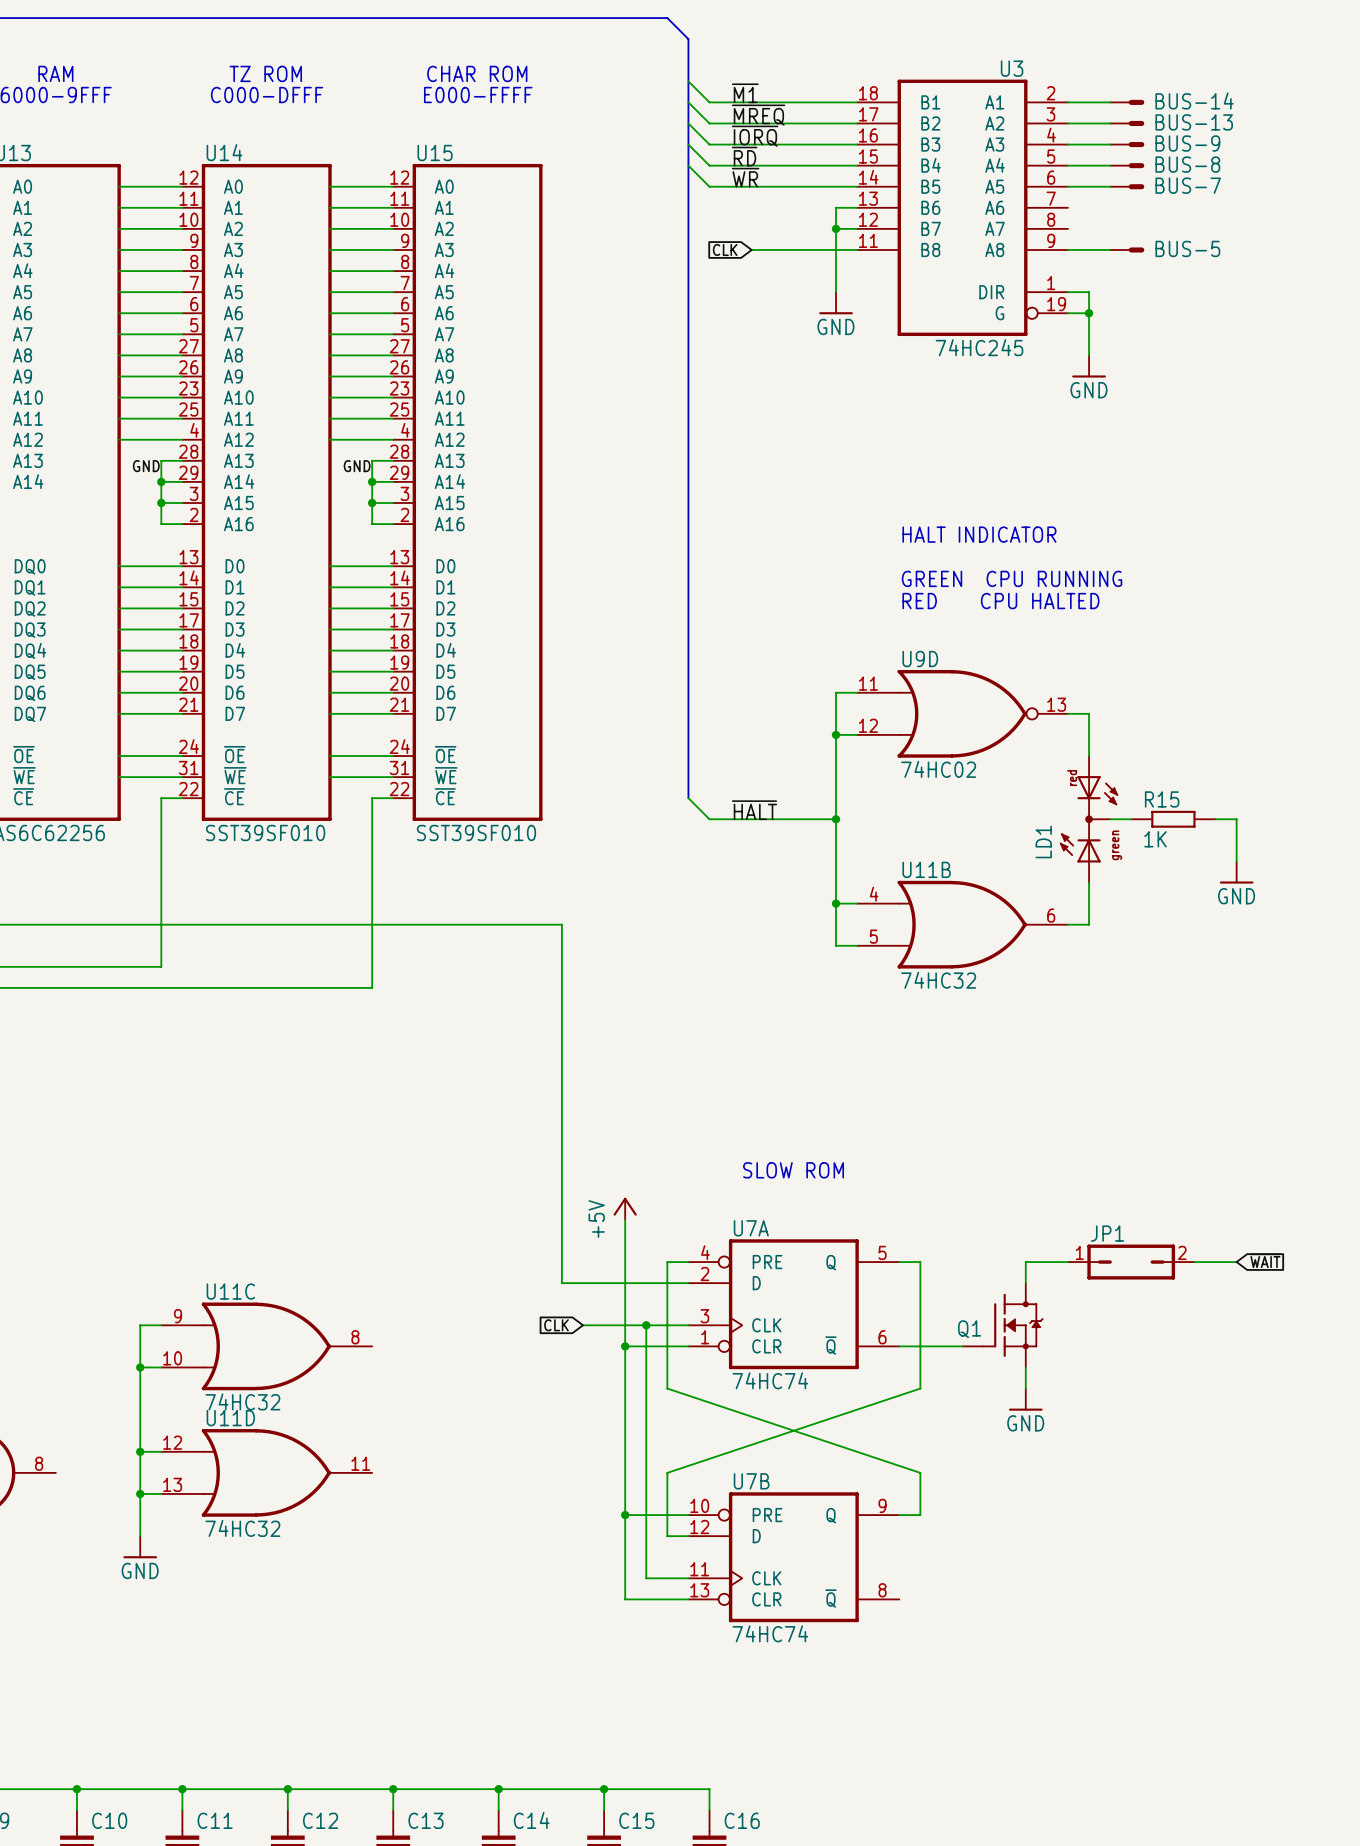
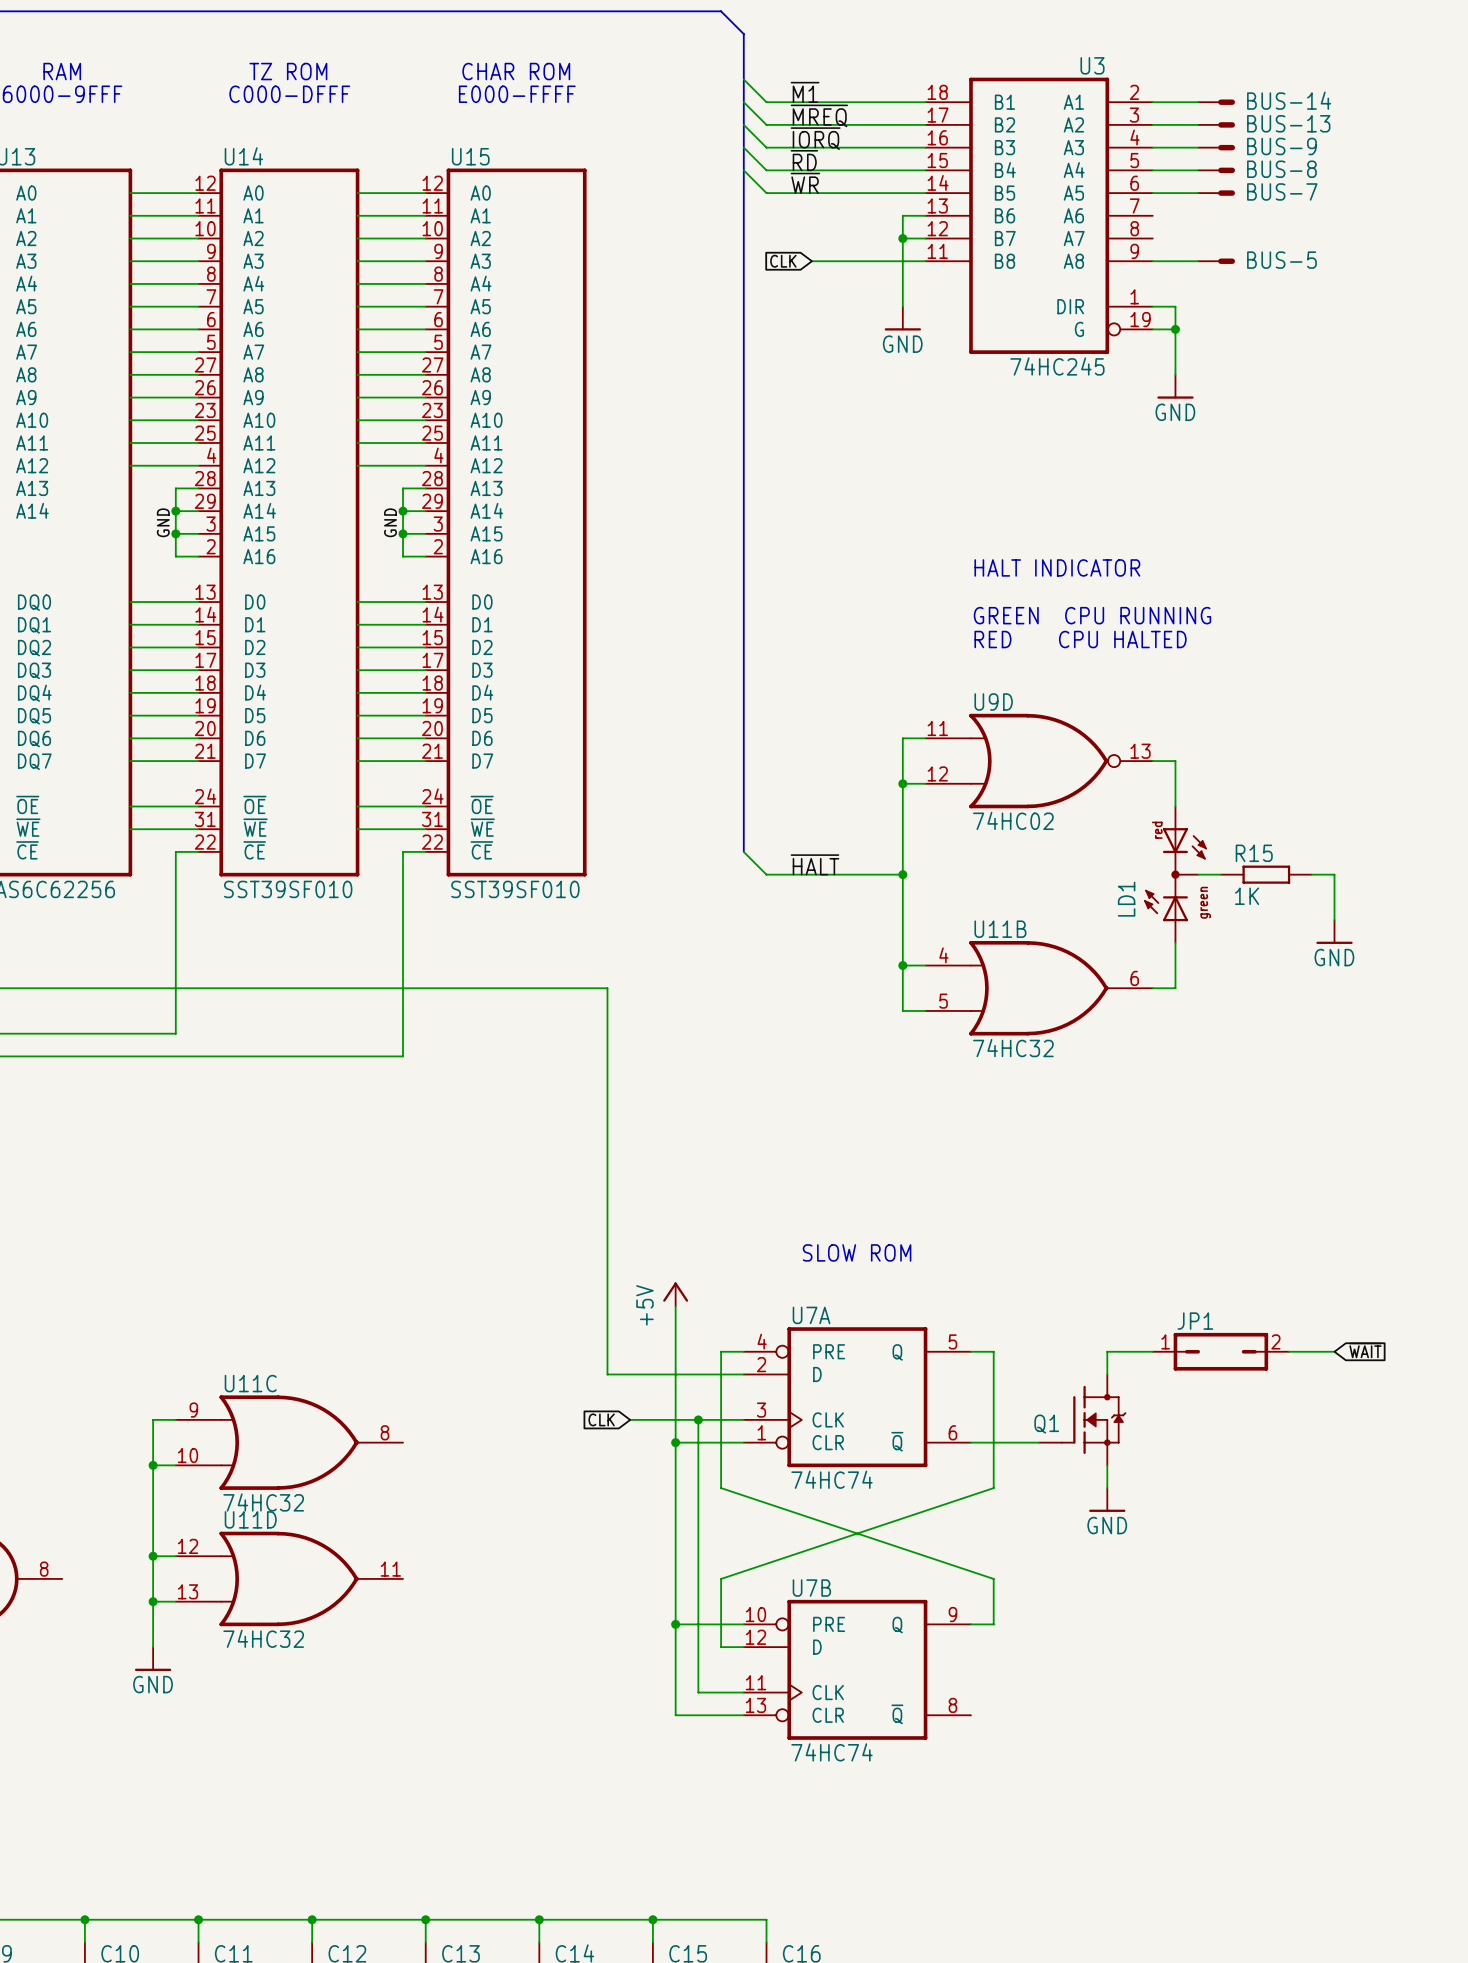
label rotation: 0° (146, 466) -> 90° counterclockwise (163, 522)
label rotation: 0° (357, 466) -> 90° counterclockwise (390, 522)

